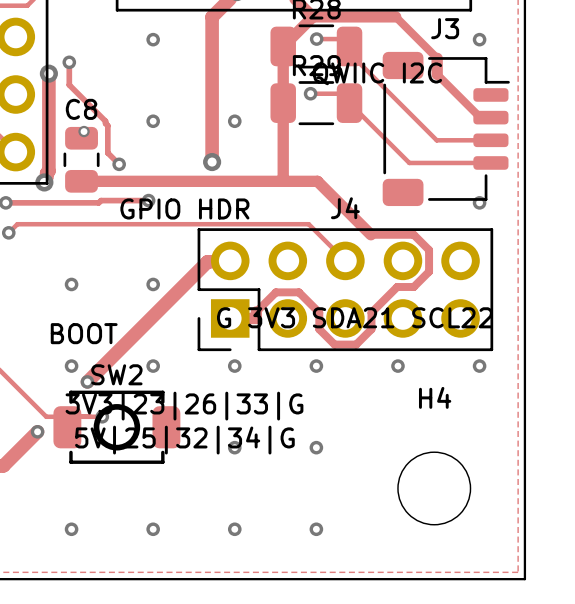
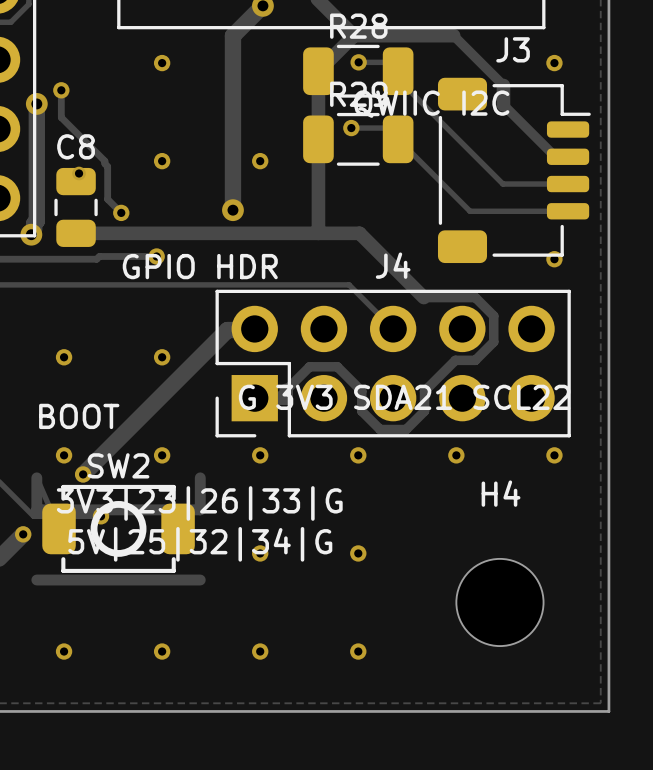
track: none -> (200, 477) (200, 509) (36, 509) (36, 477) (59, 528)
track: none -> (36, 580) (200, 580)

